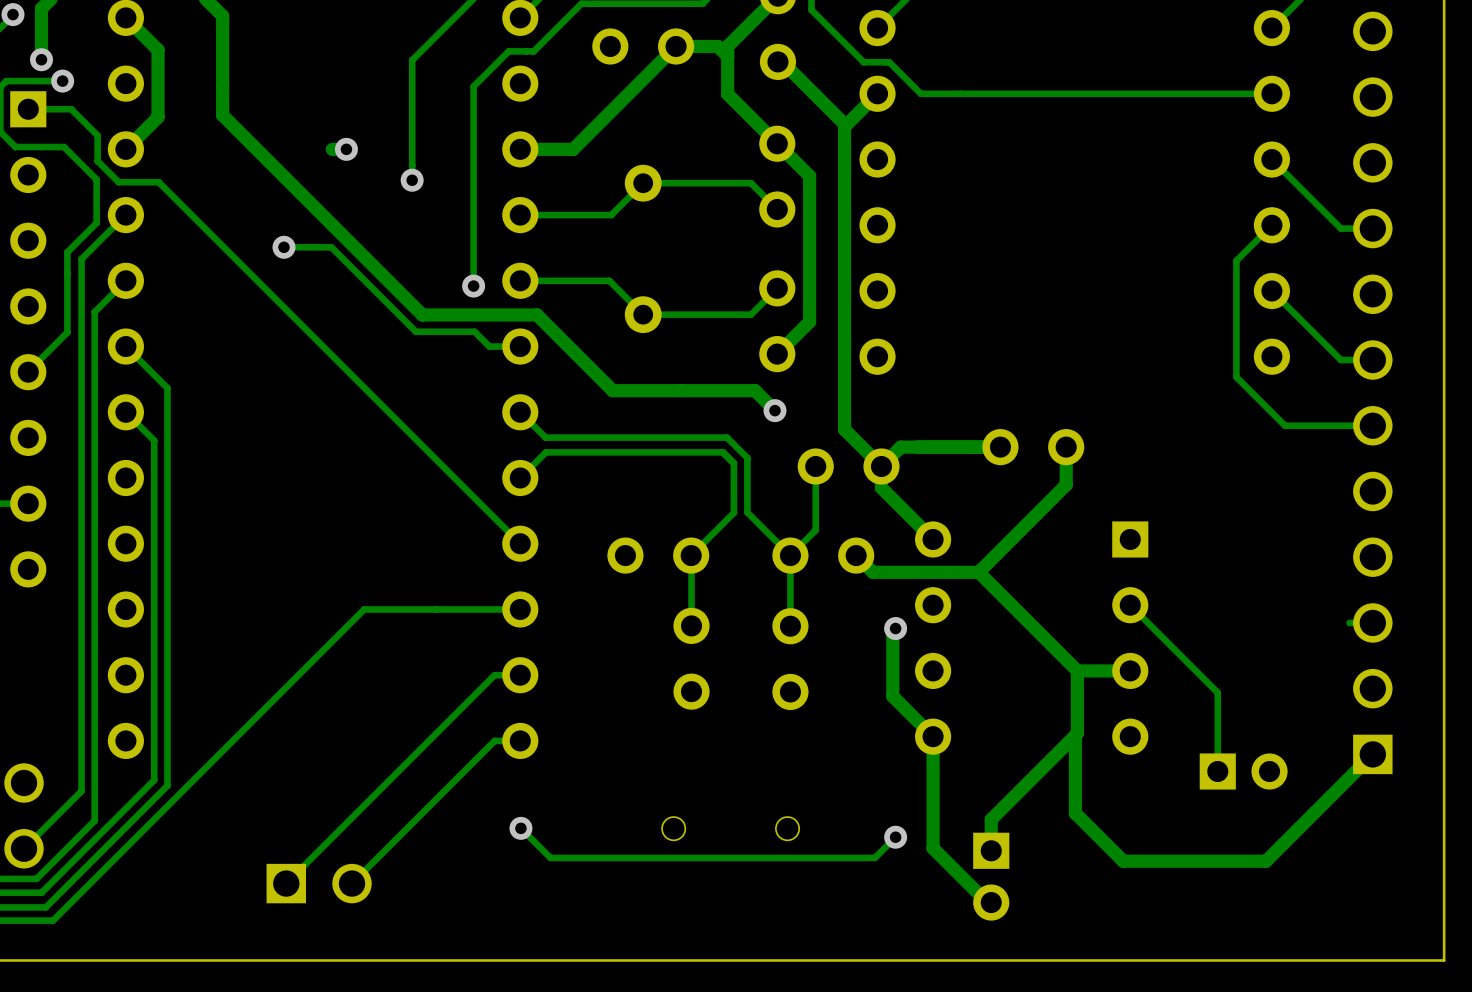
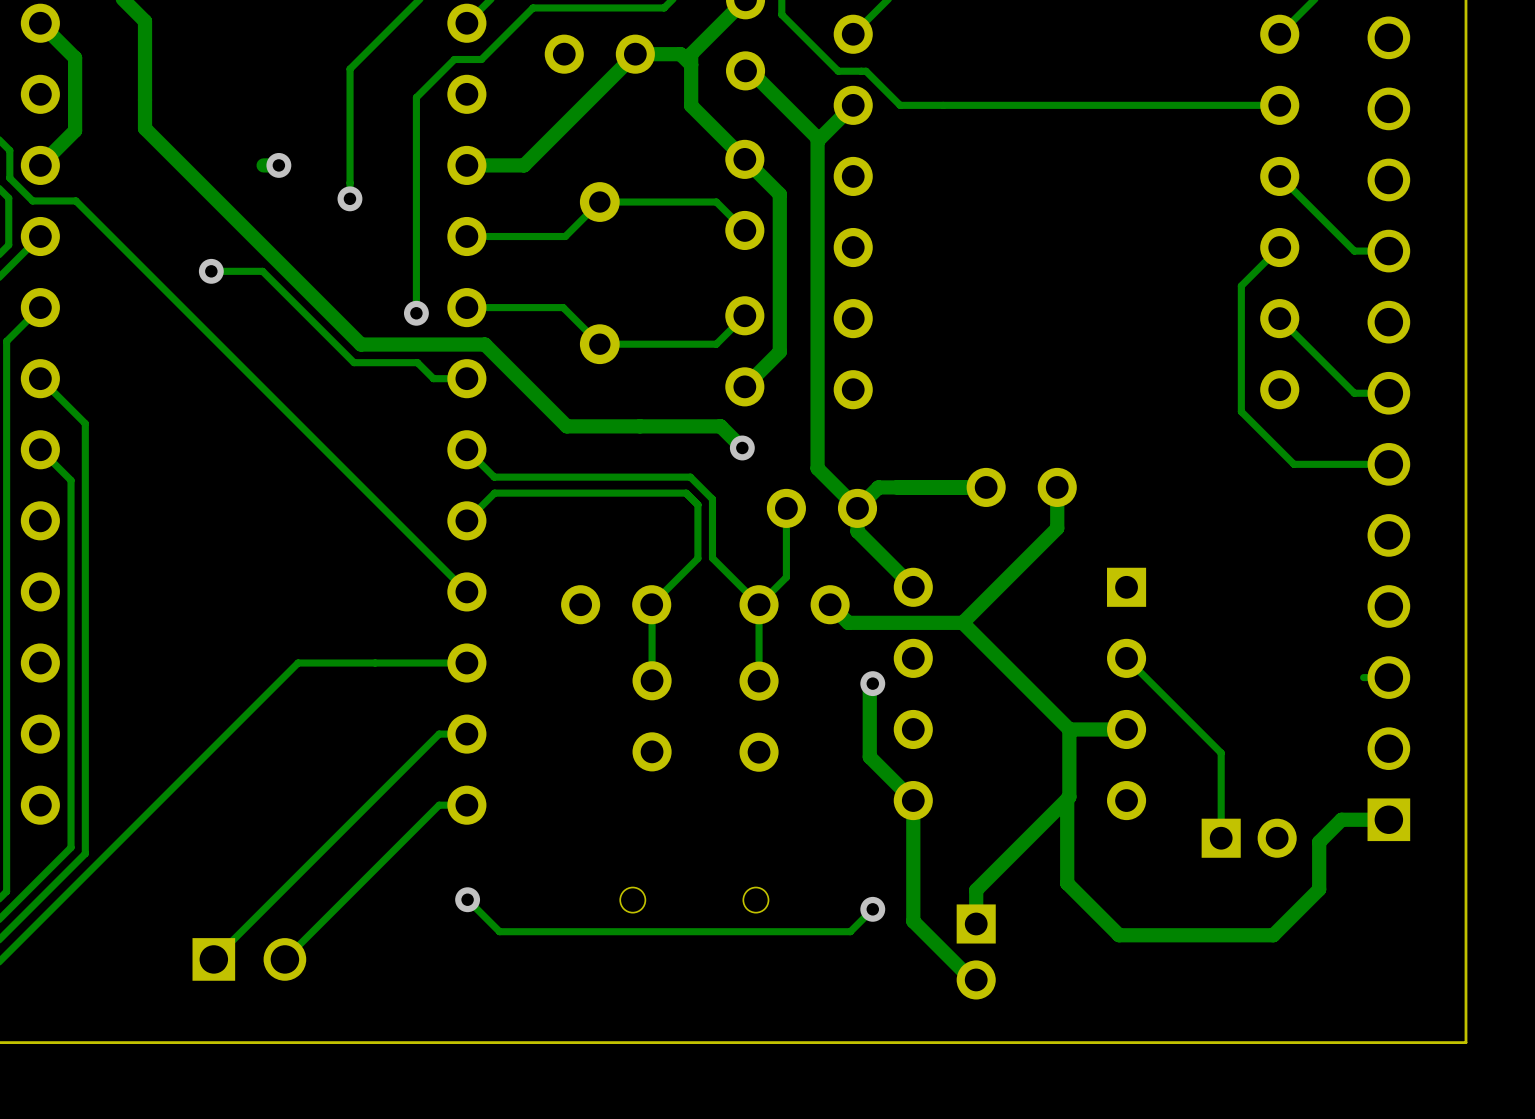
track: (1372, 754) (1308, 818) -> (1388, 819) (1341, 819) (1319, 842) (1319, 889)

